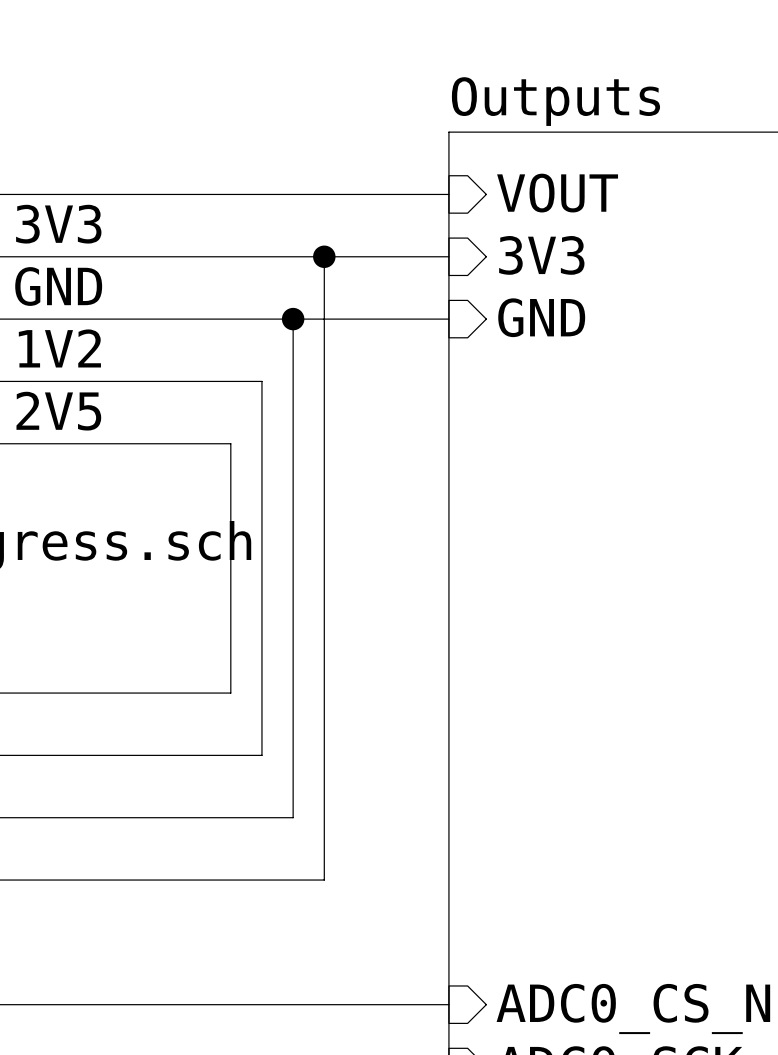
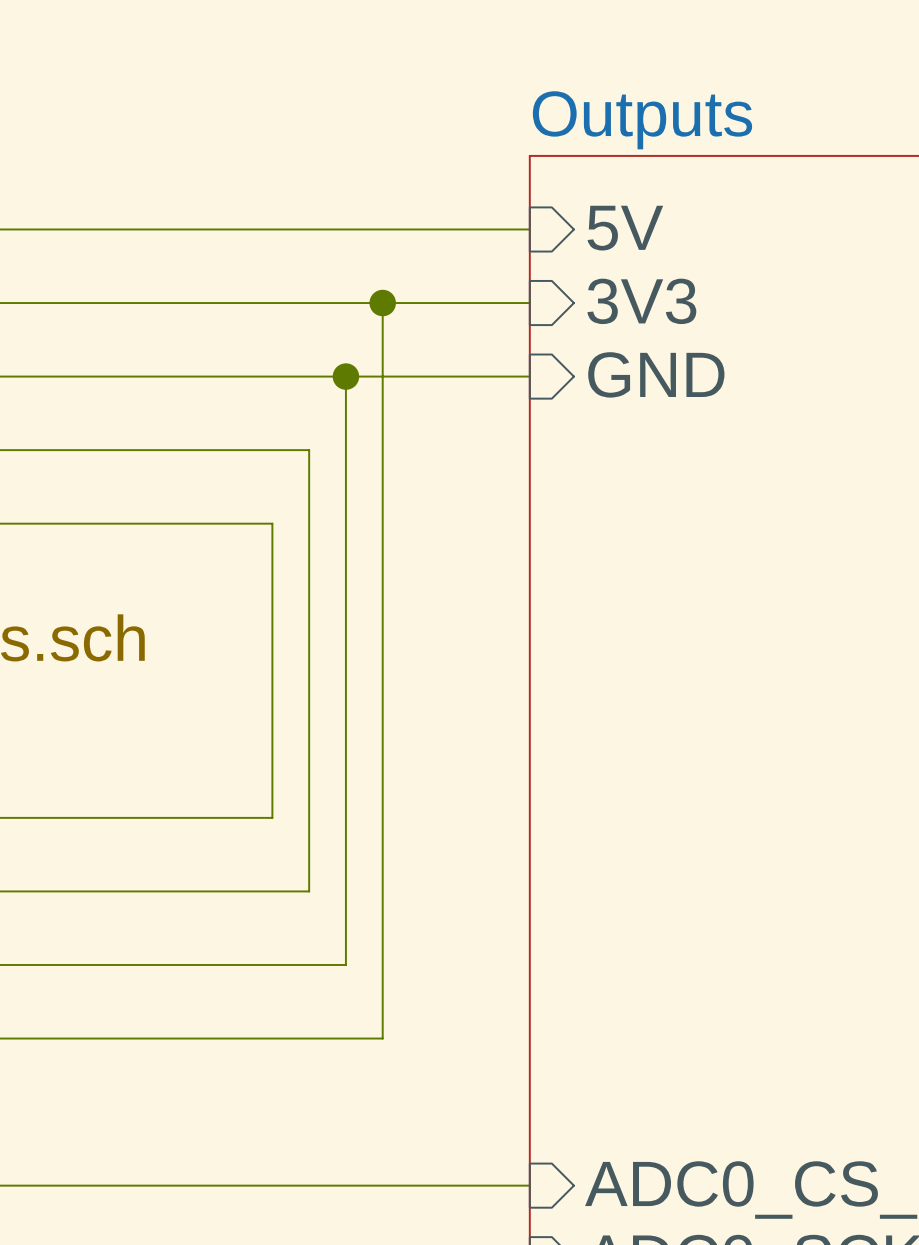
sheet pin: VOUT (557, 193) -> 5V (625, 228)
label: 3V3 (58, 224) -> none
label: GND (58, 286) -> none
label: 1V2 (59, 348) -> none
label: 2V5 (58, 411) -> none

